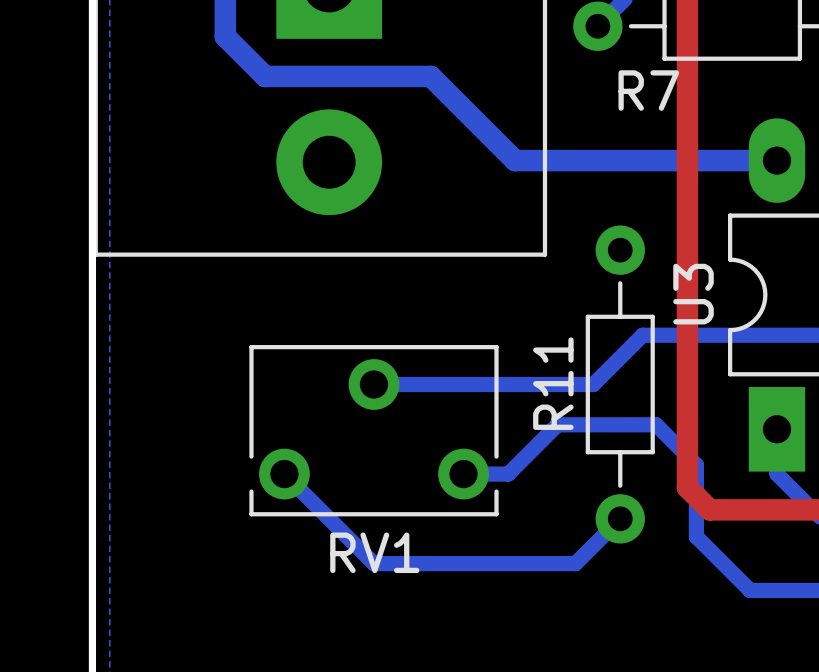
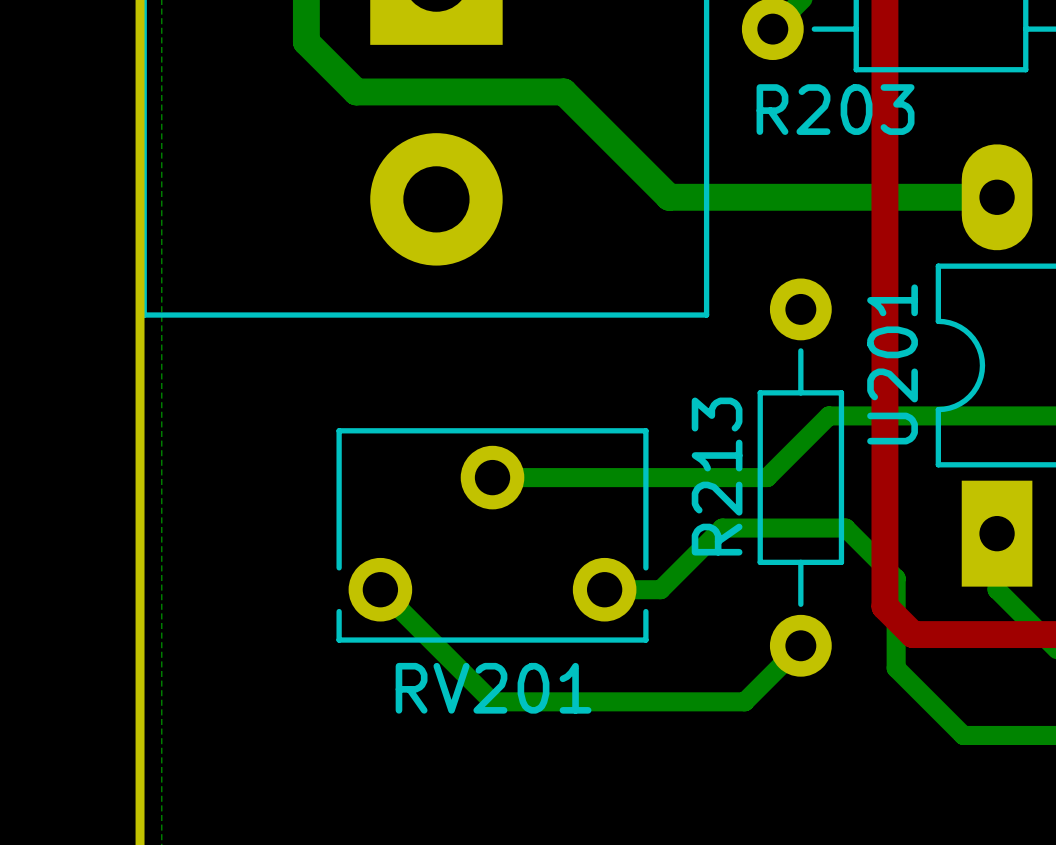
R7 name: R7 (648, 90) -> R203 (835, 109)
U3 name: U3 (693, 294) -> U201 (892, 364)
R11 name: R11 (553, 383) -> R213 (717, 476)
RV1 name: RV1 (374, 552) -> RV201 (493, 688)

